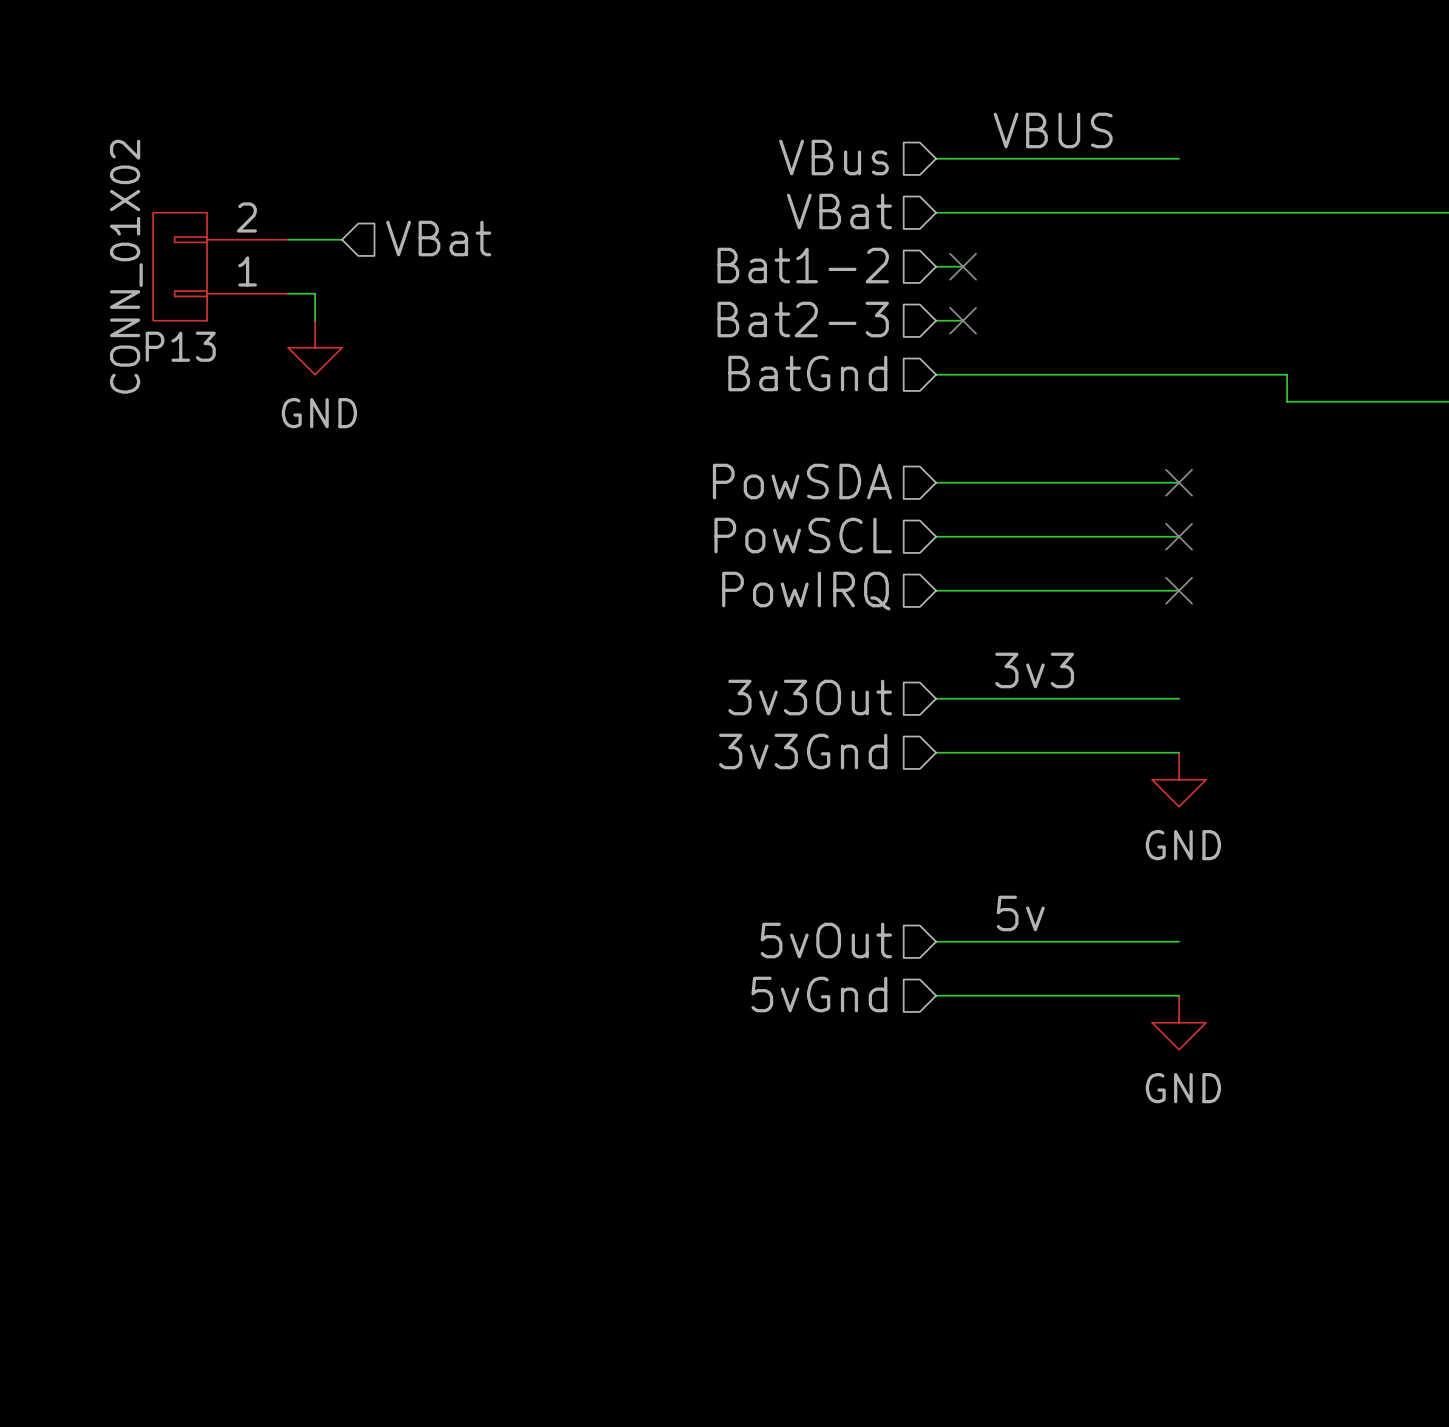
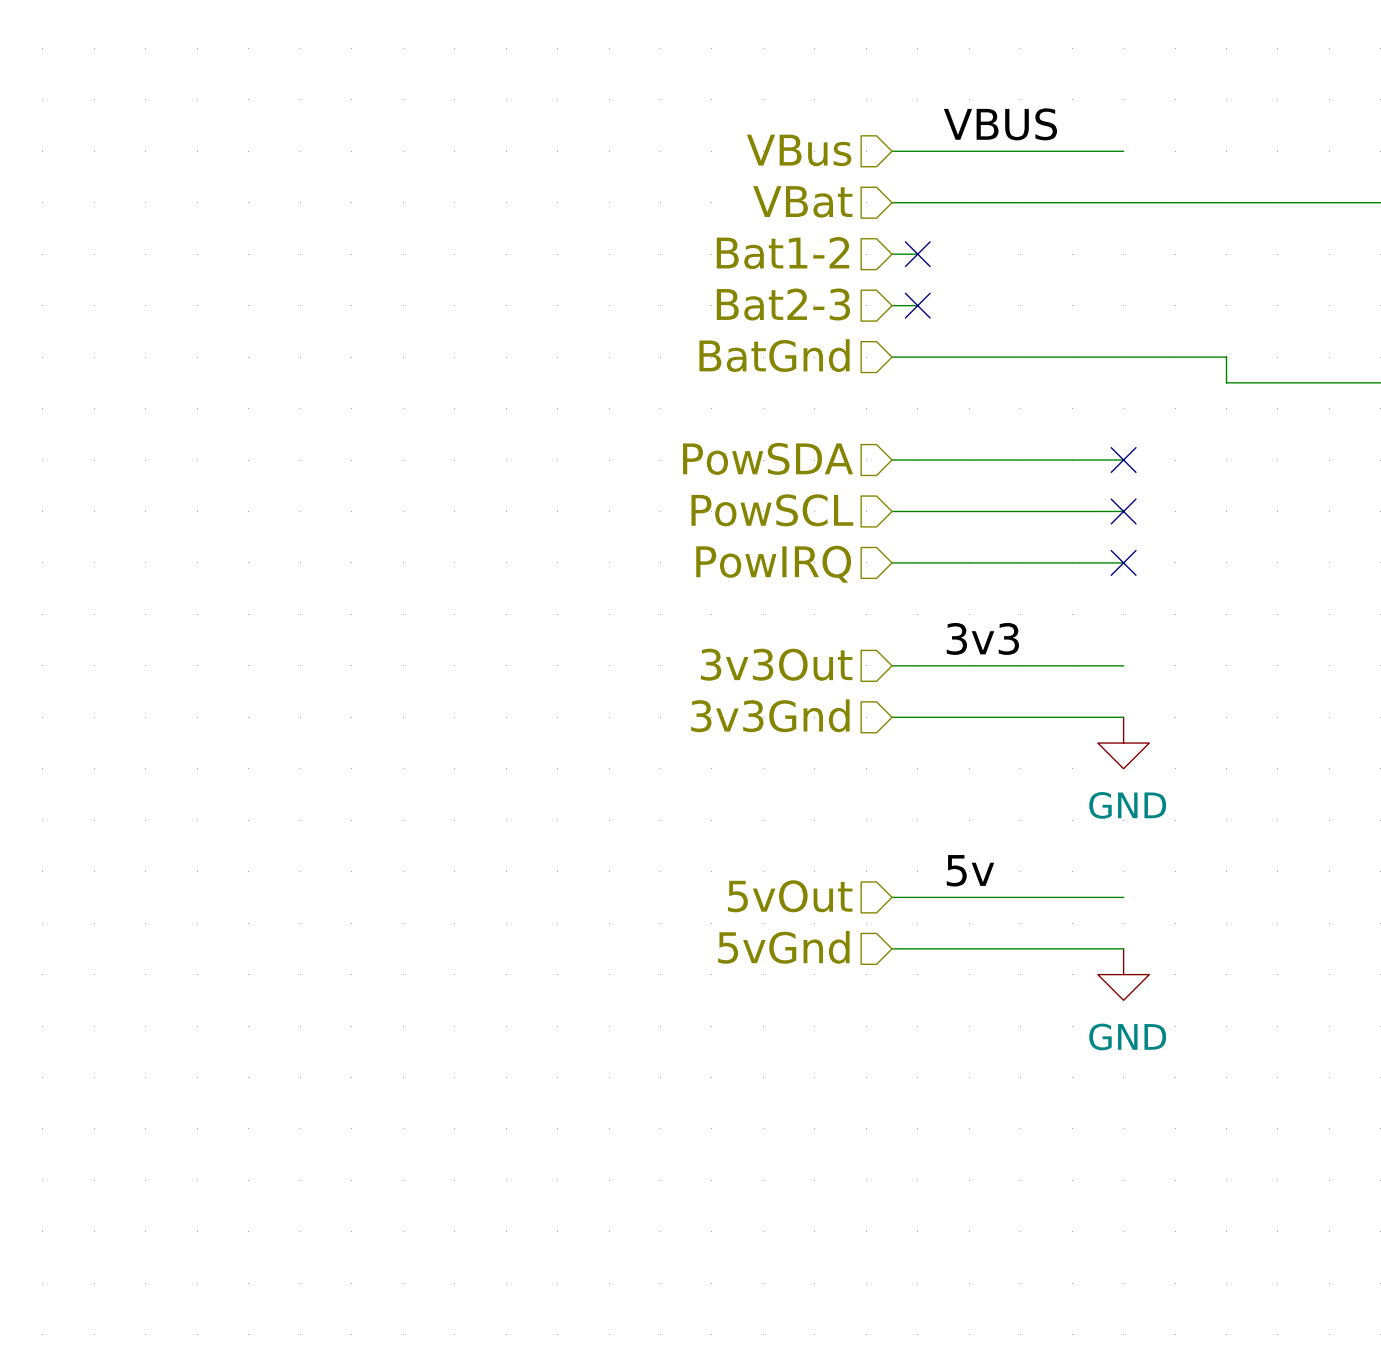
hierarchical label: VBat (438, 238) -> none
wire: (288, 239) (342, 239) -> none
P13: CONN_01X02 (220, 266) -> none
wire: (288, 293) (315, 293) (315, 320) -> none
power symbol: GND (315, 347) -> none

